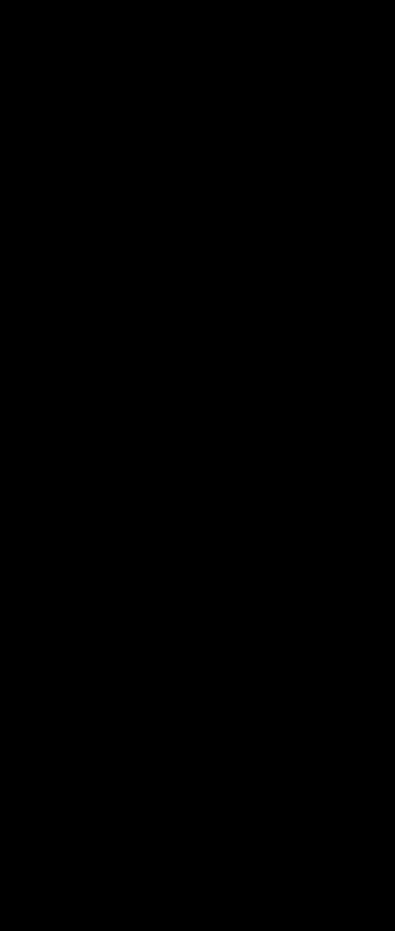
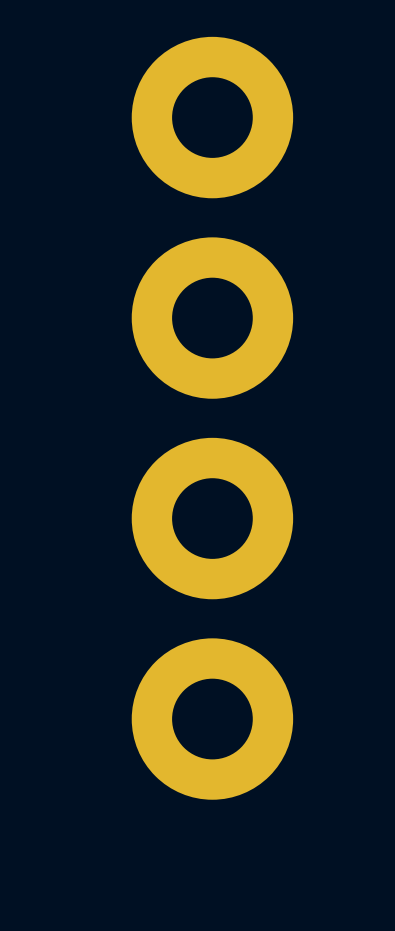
part: none -> (212, 117)
part: none -> (212, 318)
part: none -> (212, 518)
part: none -> (212, 719)

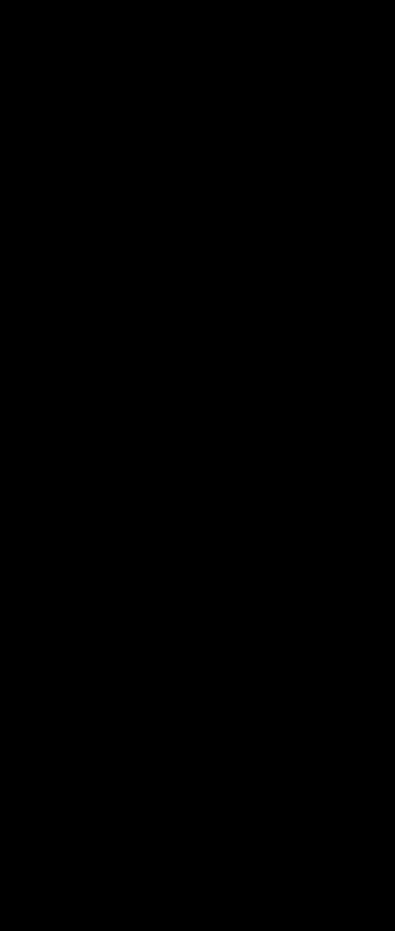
part: (212, 117) -> none
part: (212, 318) -> none
part: (212, 518) -> none
part: (212, 719) -> none

